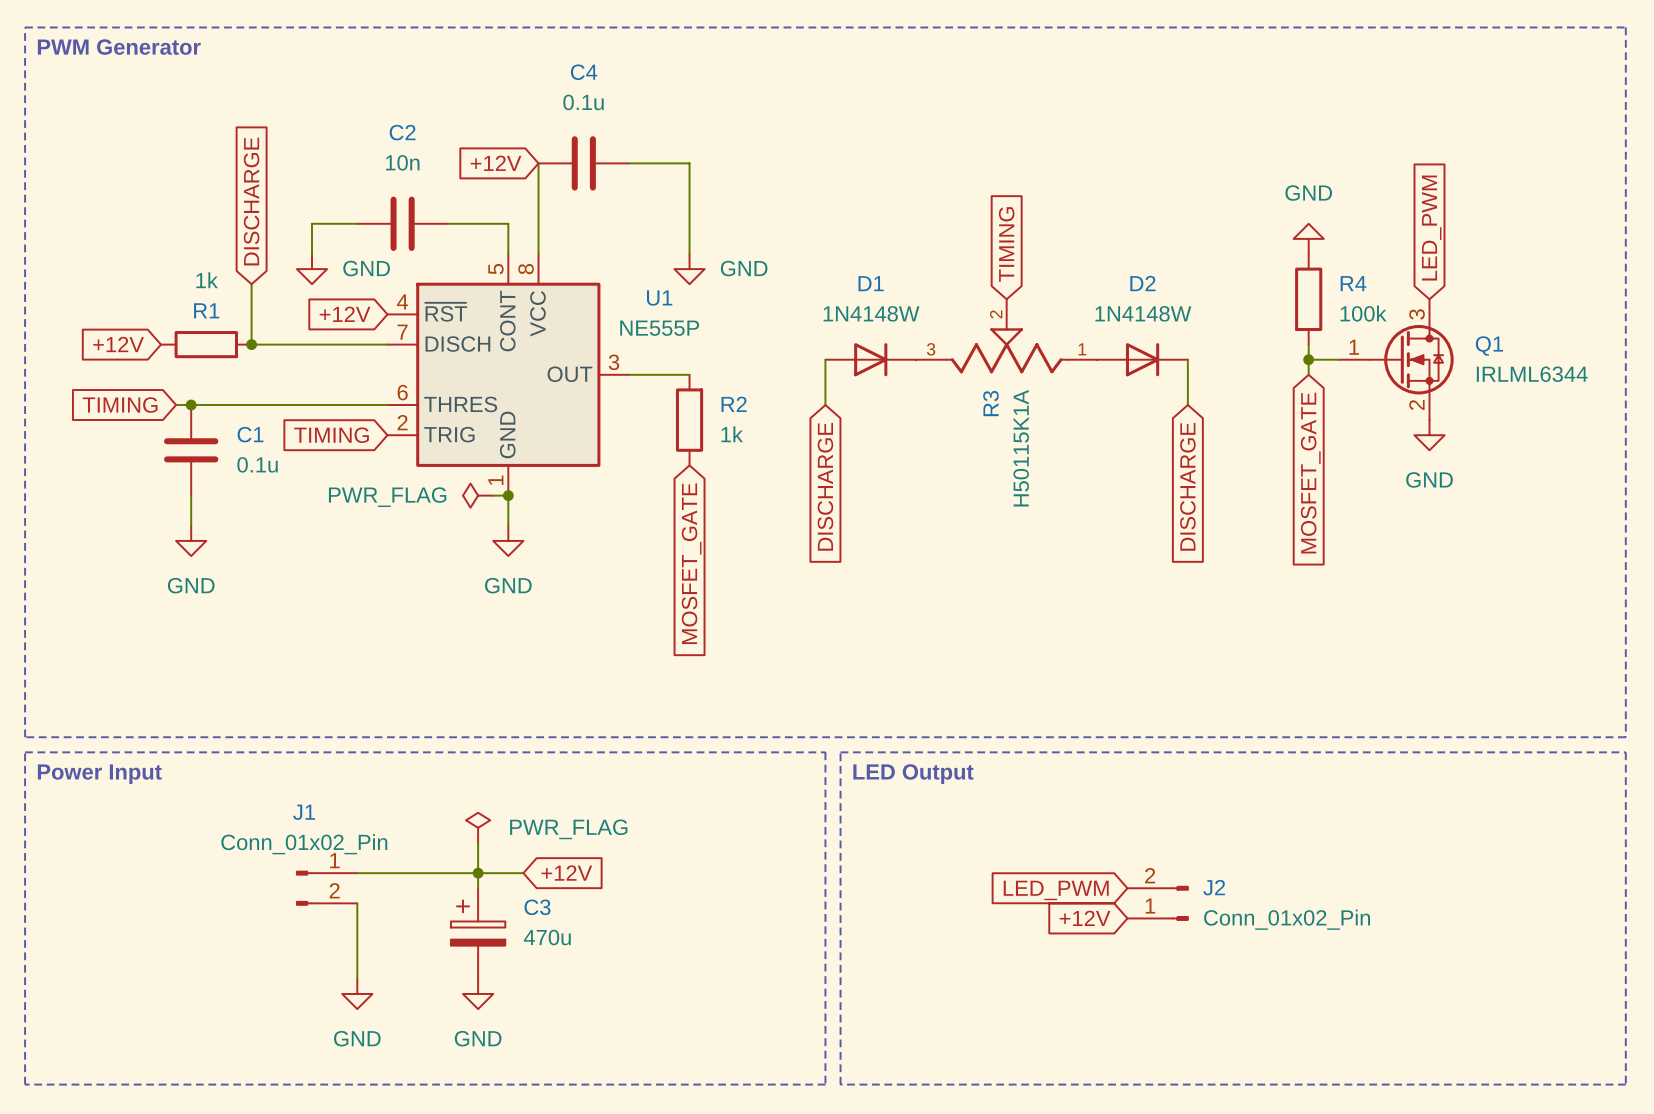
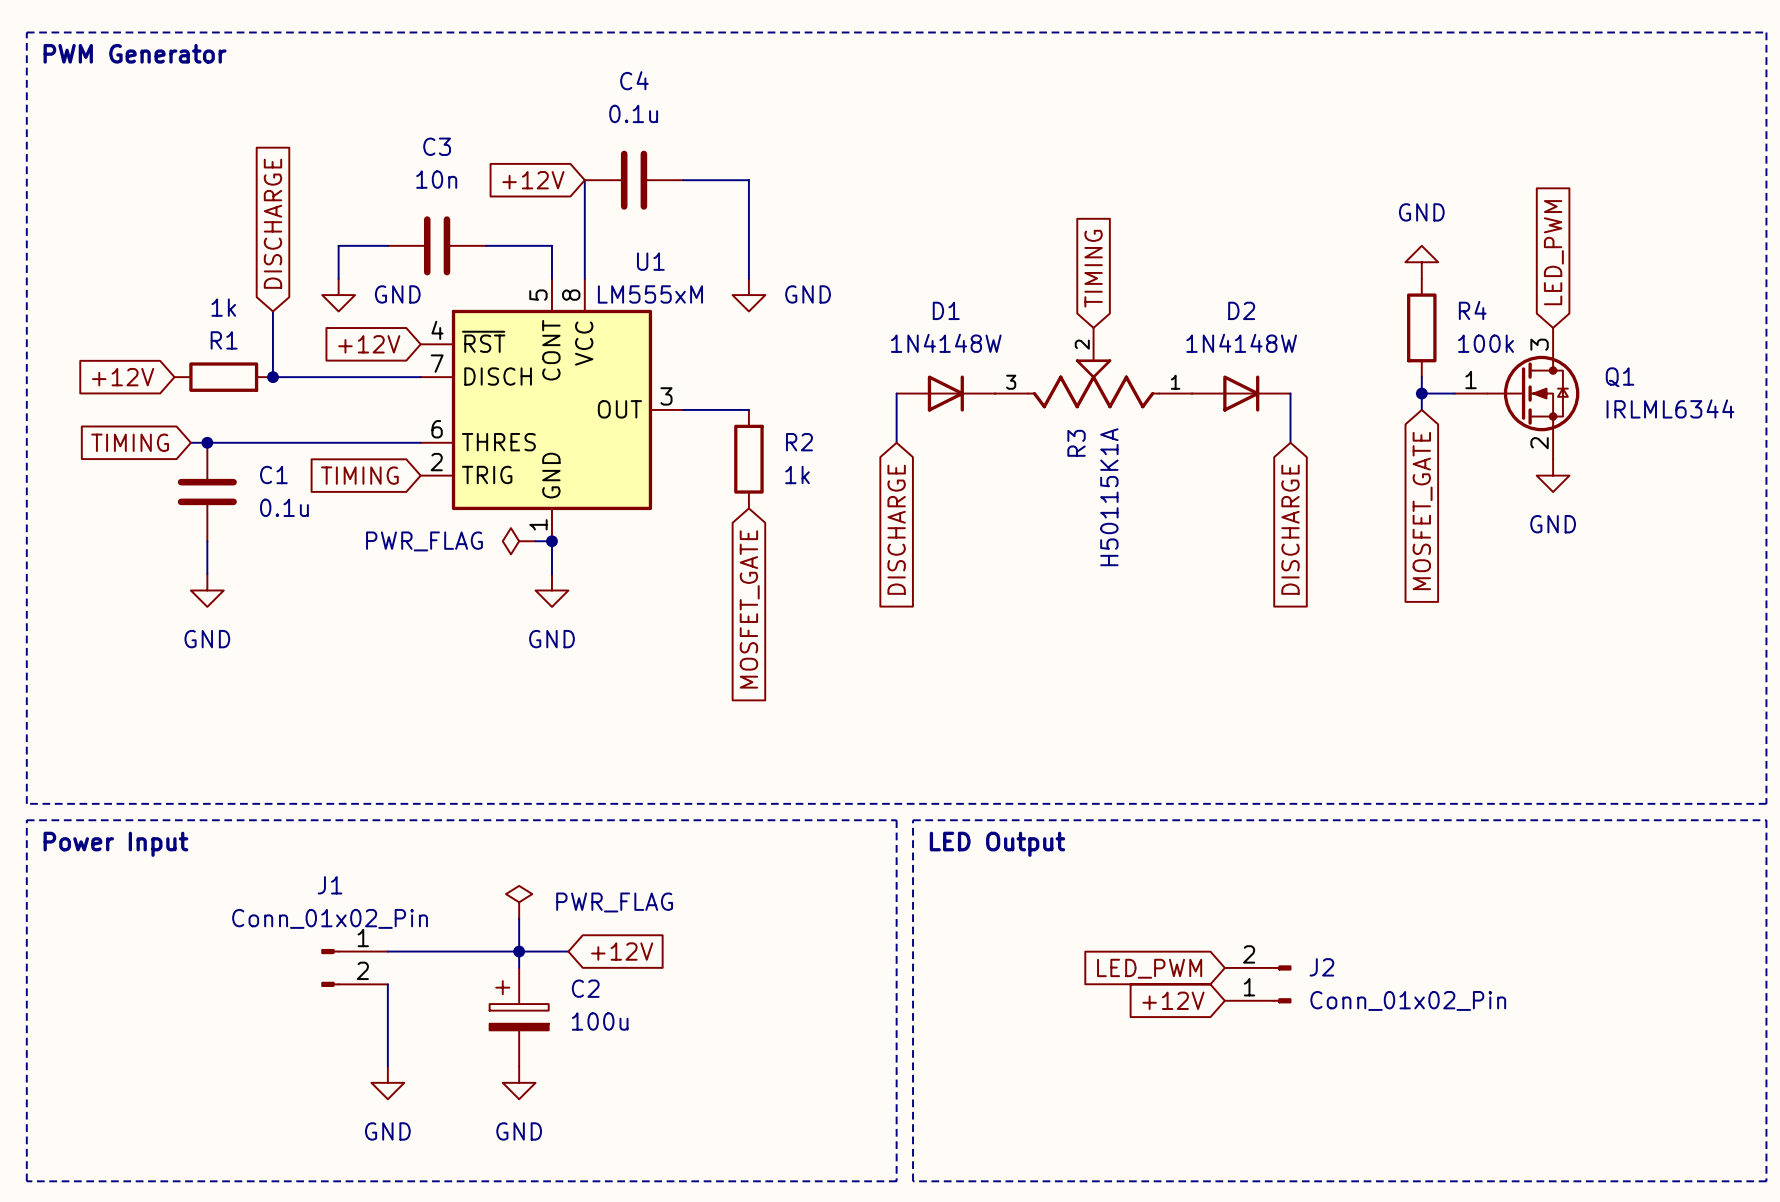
C2 name: C2 (402, 132) -> C3 (437, 146)
U1 name position: U1 (659, 298) -> U1 (650, 261)
U1 value: NE555P (659, 328) -> LM555xM (650, 294)
C3 name: C3 (537, 907) -> C2 (585, 988)
C3 value: 470u (547, 937) -> 100u (600, 1021)

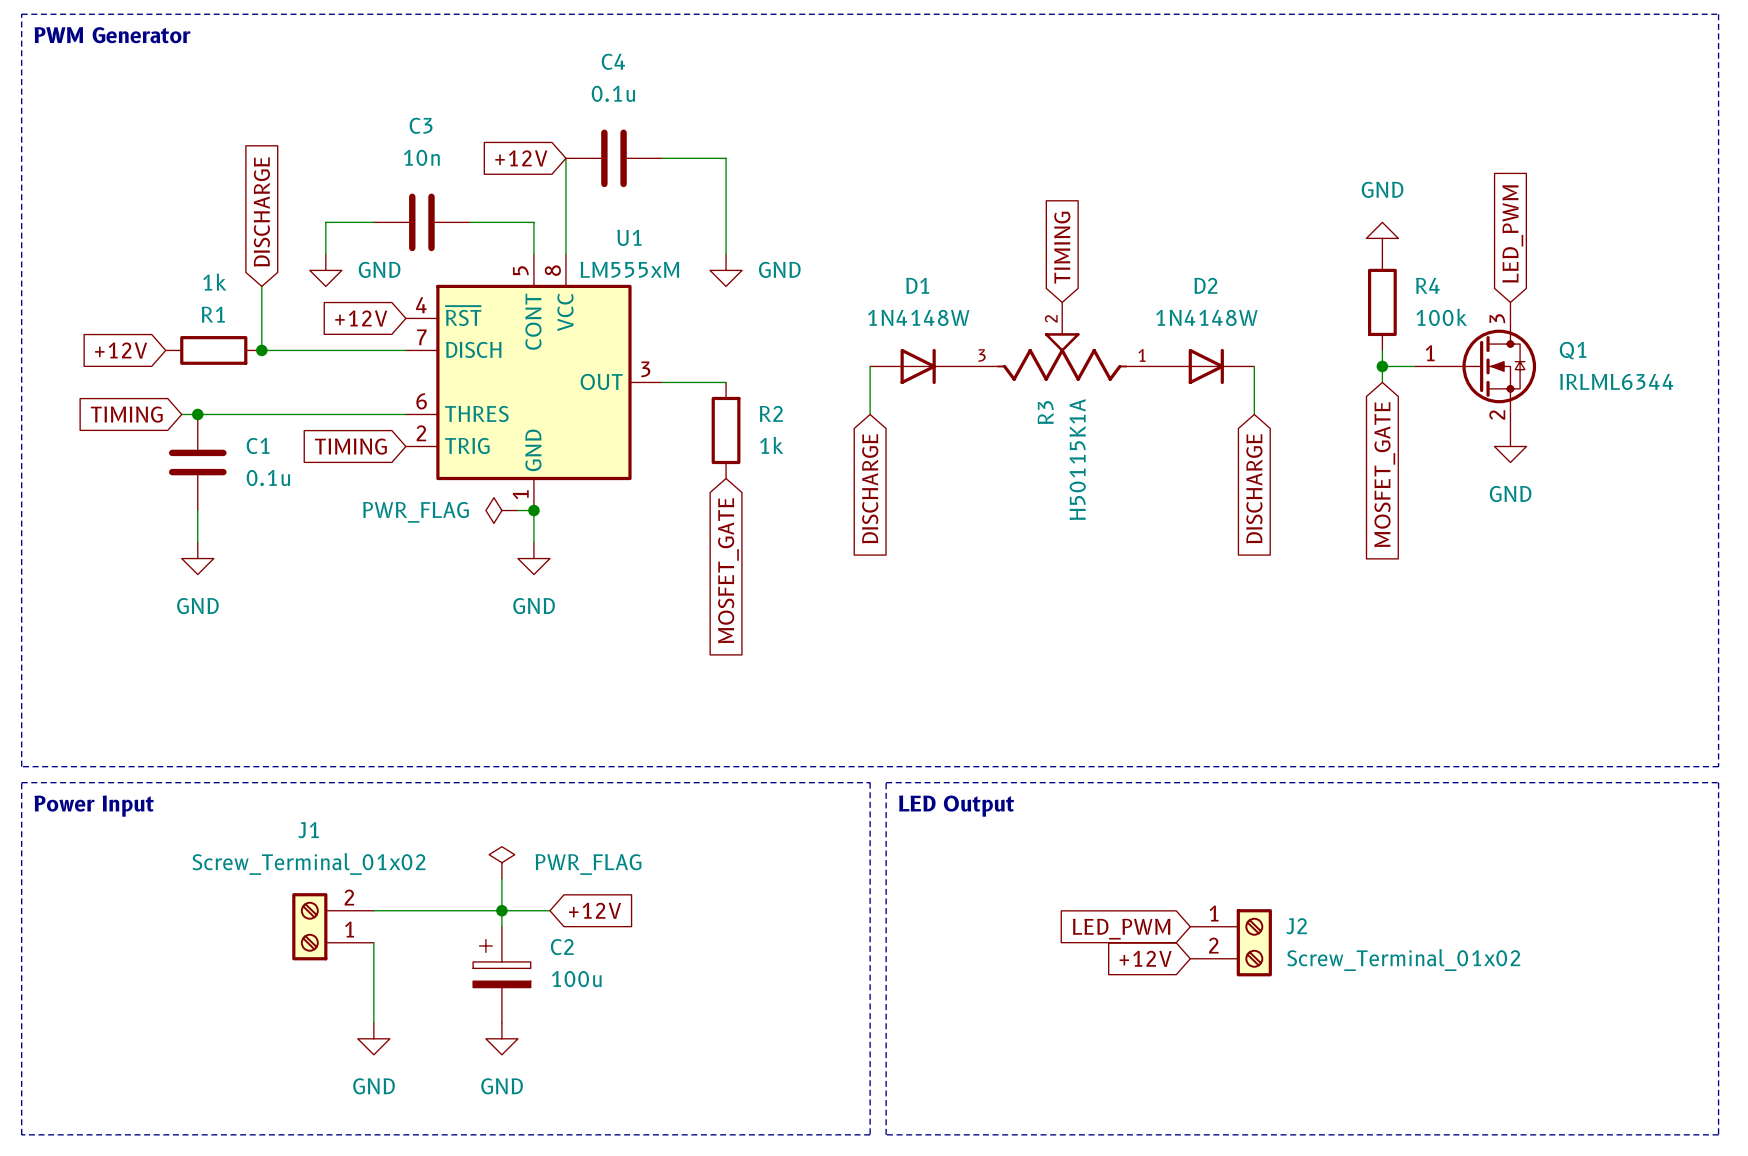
J1 value: Conn_01x02_Pin (330, 918) -> Screw_Terminal_01x02 (308, 863)
J1 symbol: [321, 948, 388, 988] -> [292, 893, 374, 961]
J2 symbol: [1224, 965, 1292, 1004] -> [1190, 909, 1272, 977]
J2 value: Conn_01x02_Pin (1408, 1000) -> Screw_Terminal_01x02 (1403, 960)

